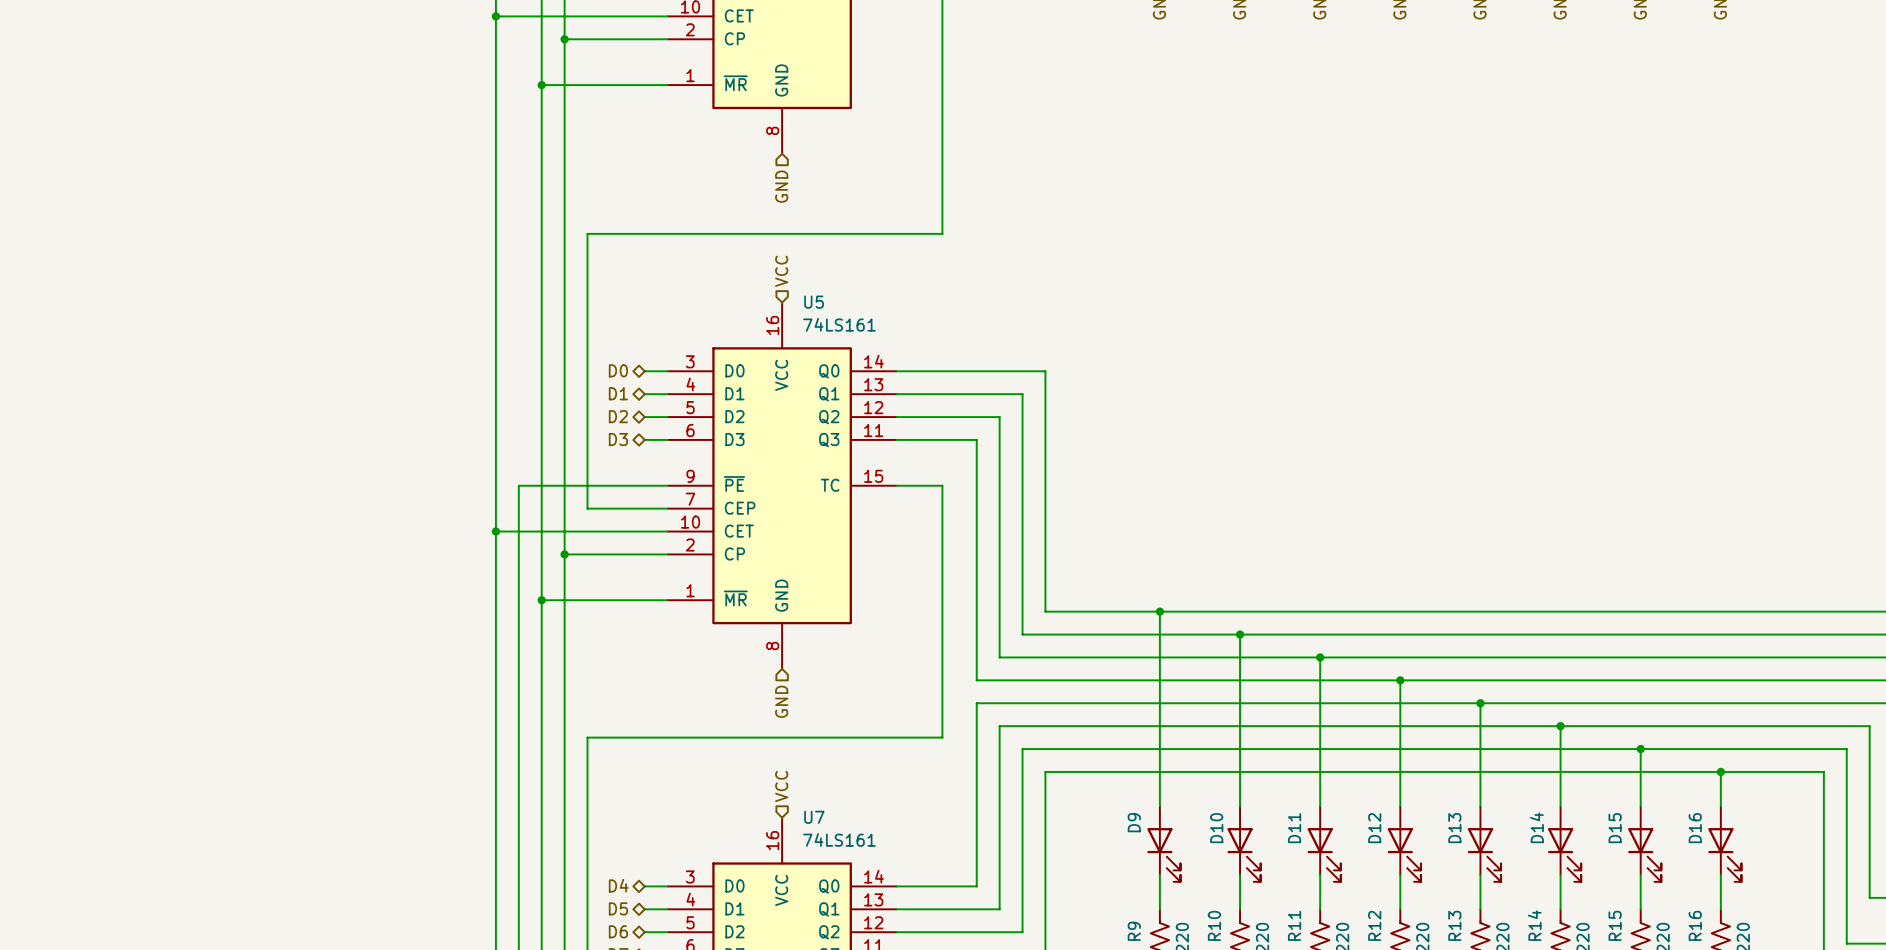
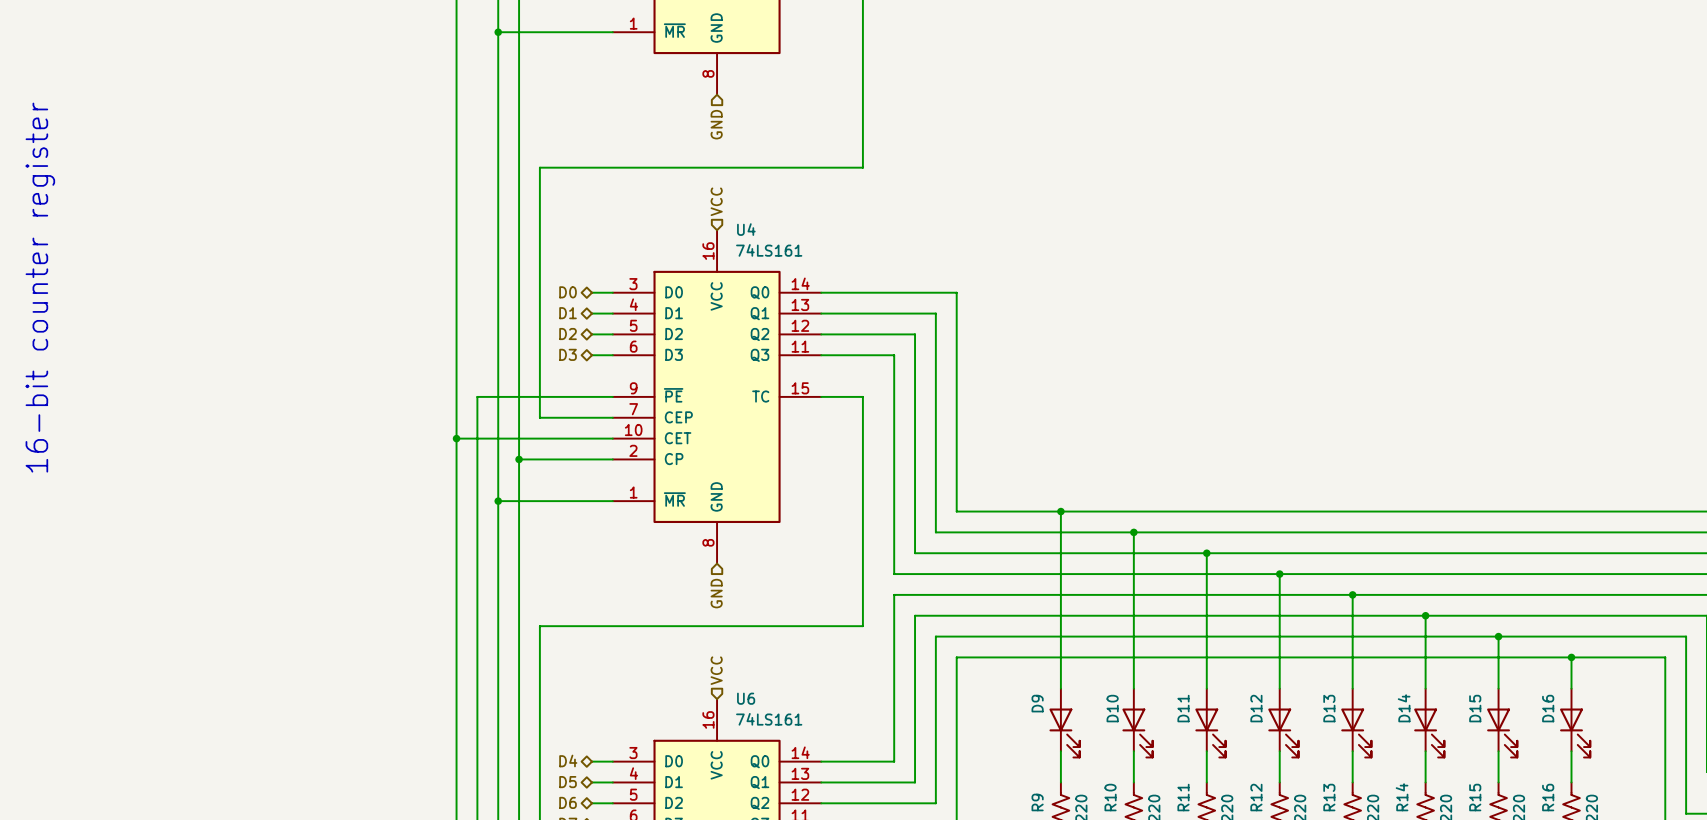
U5 name: U5 (814, 302) -> U4 (746, 229)
text: none -> 16-bit counter register (40, 287)
U7 name: U7 (814, 817) -> U6 (746, 698)

